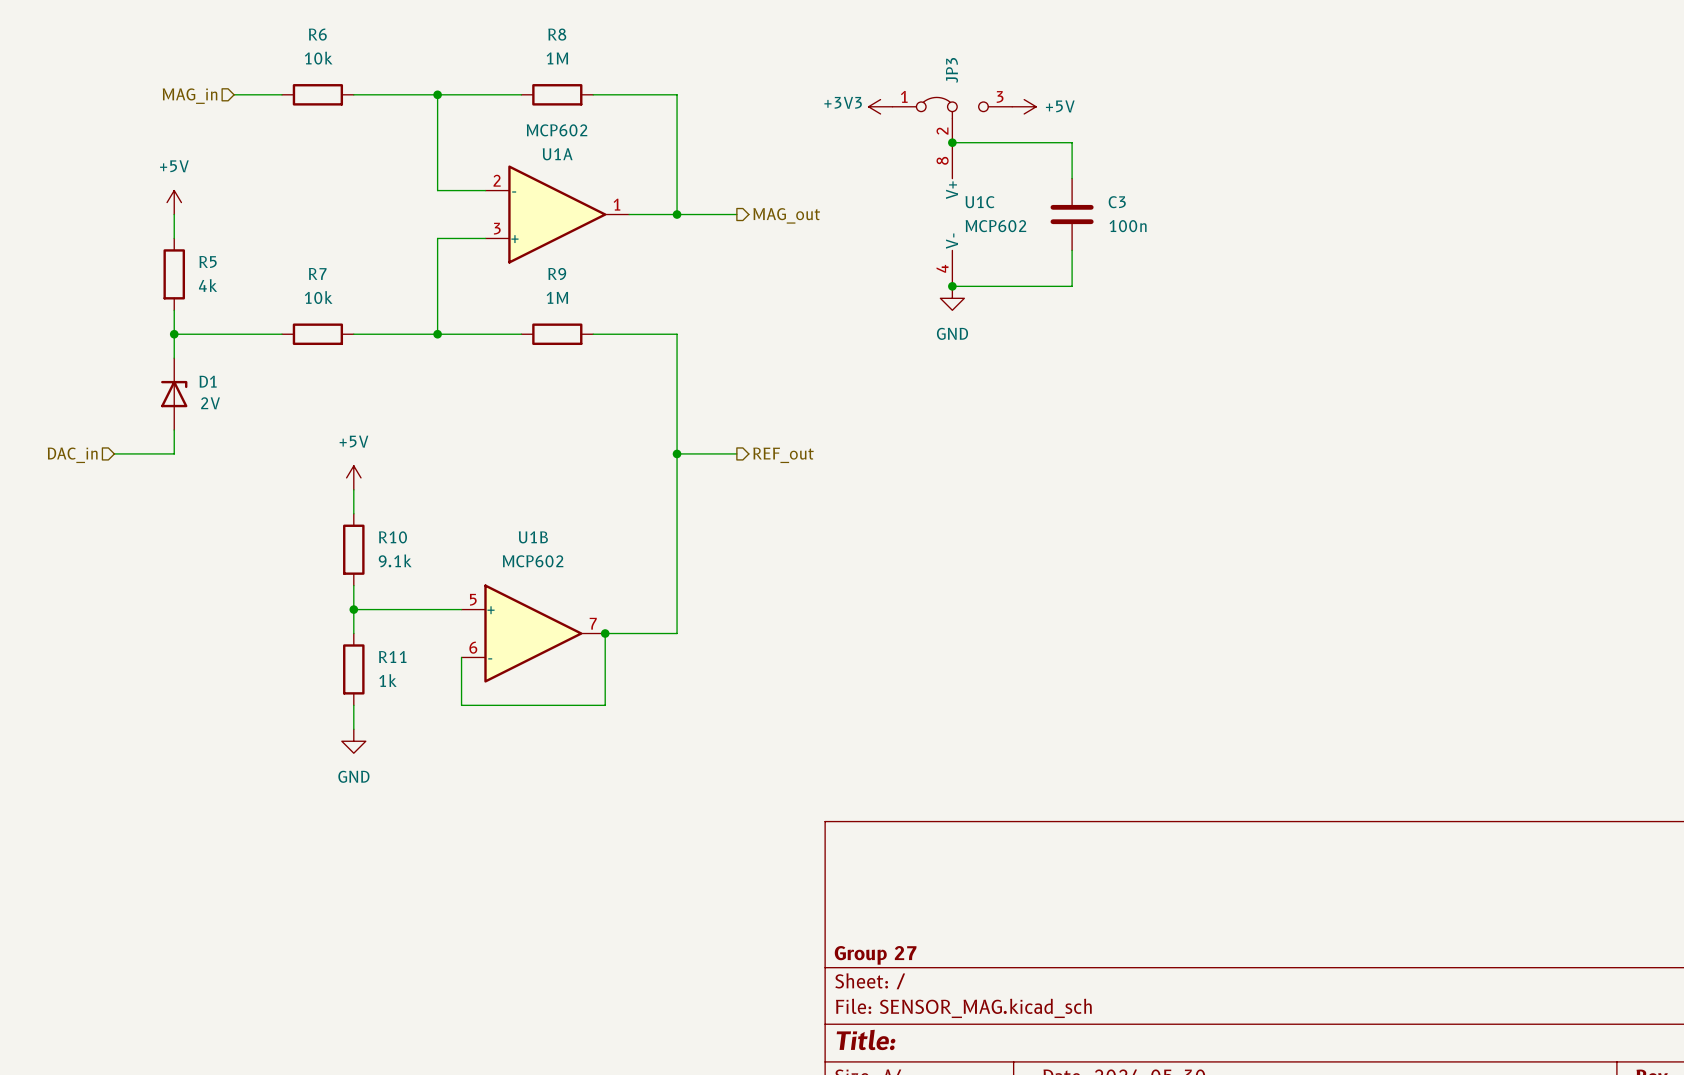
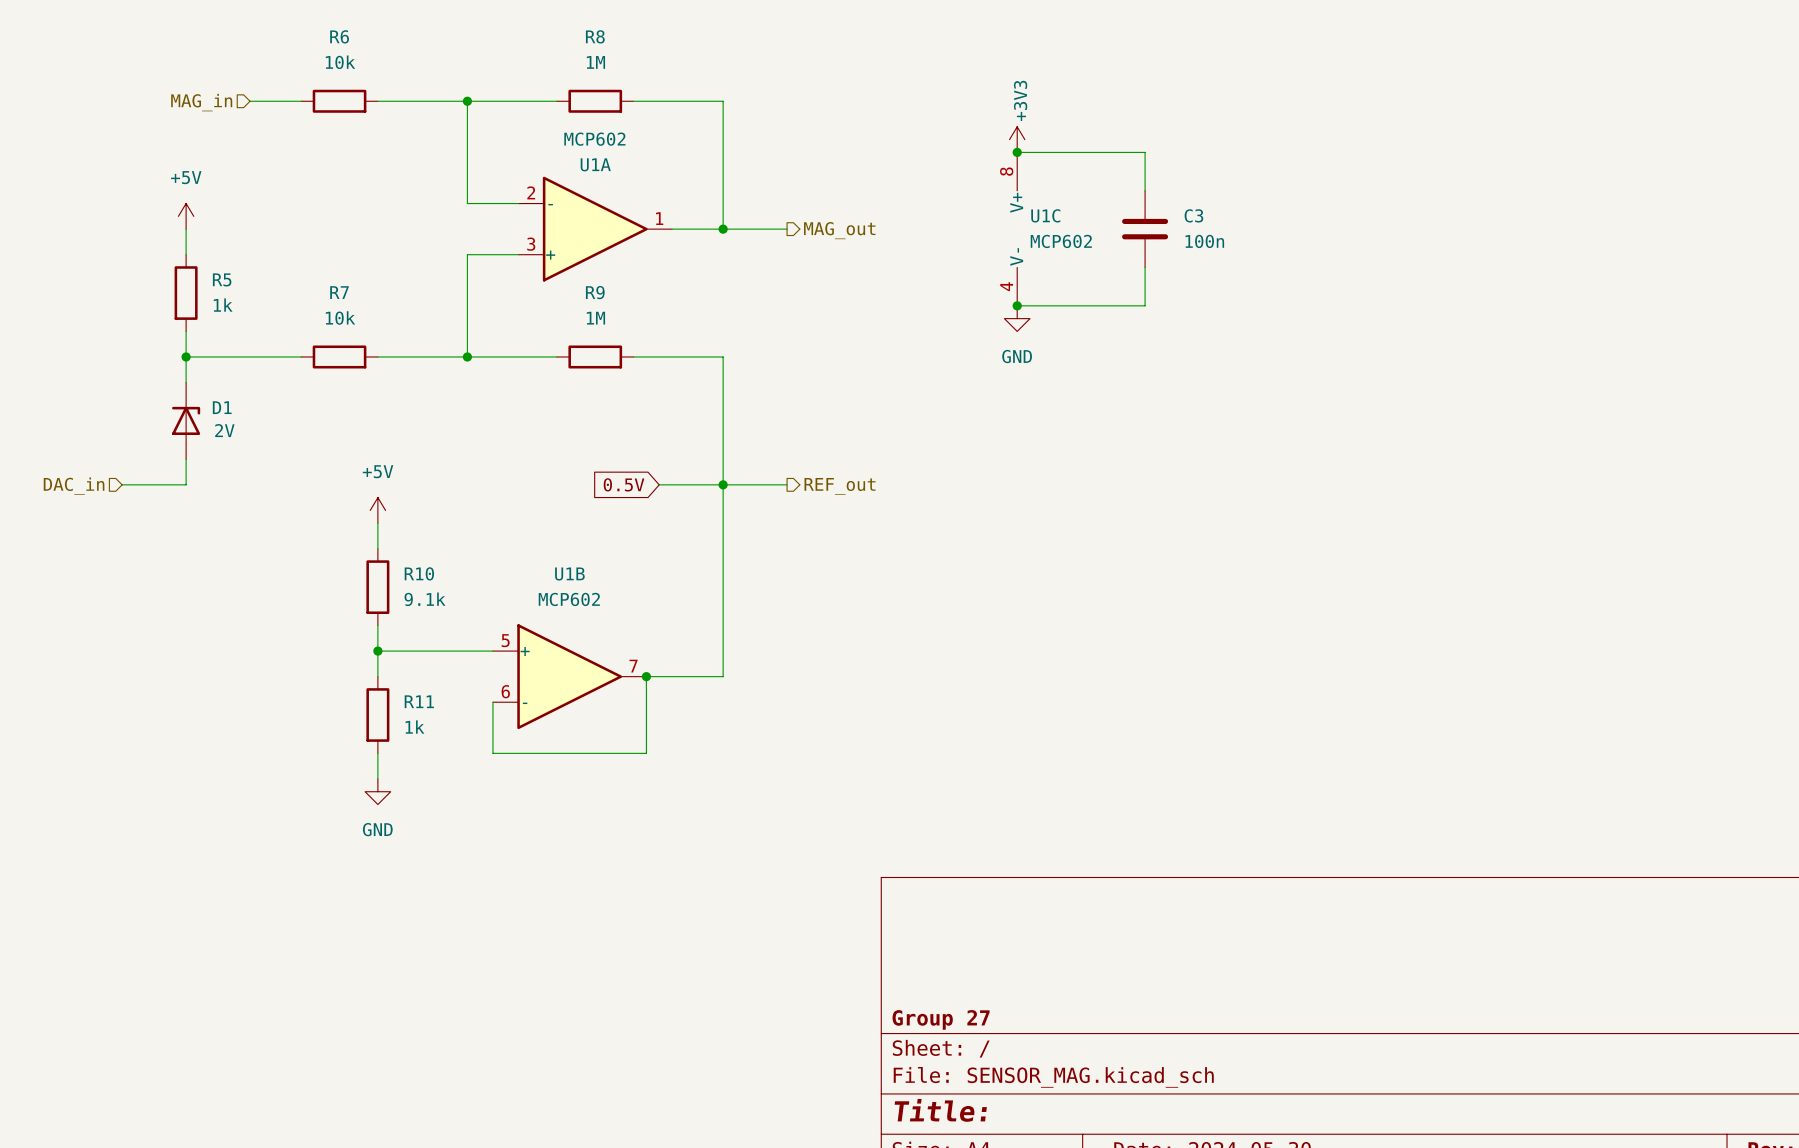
power symbol rotation: 0° (880, 106) -> 90° clockwise (1017, 139)
power symbol position: +3V3 (880, 106) -> +3V3 (1017, 139)
power symbol: +5V (1024, 106) -> none
JP3: (952, 120) -> none
R5 value: 4k (208, 285) -> 1k (223, 305)
wire: none -> (659, 484) (723, 484)
global label: none -> 0.5V (624, 484)

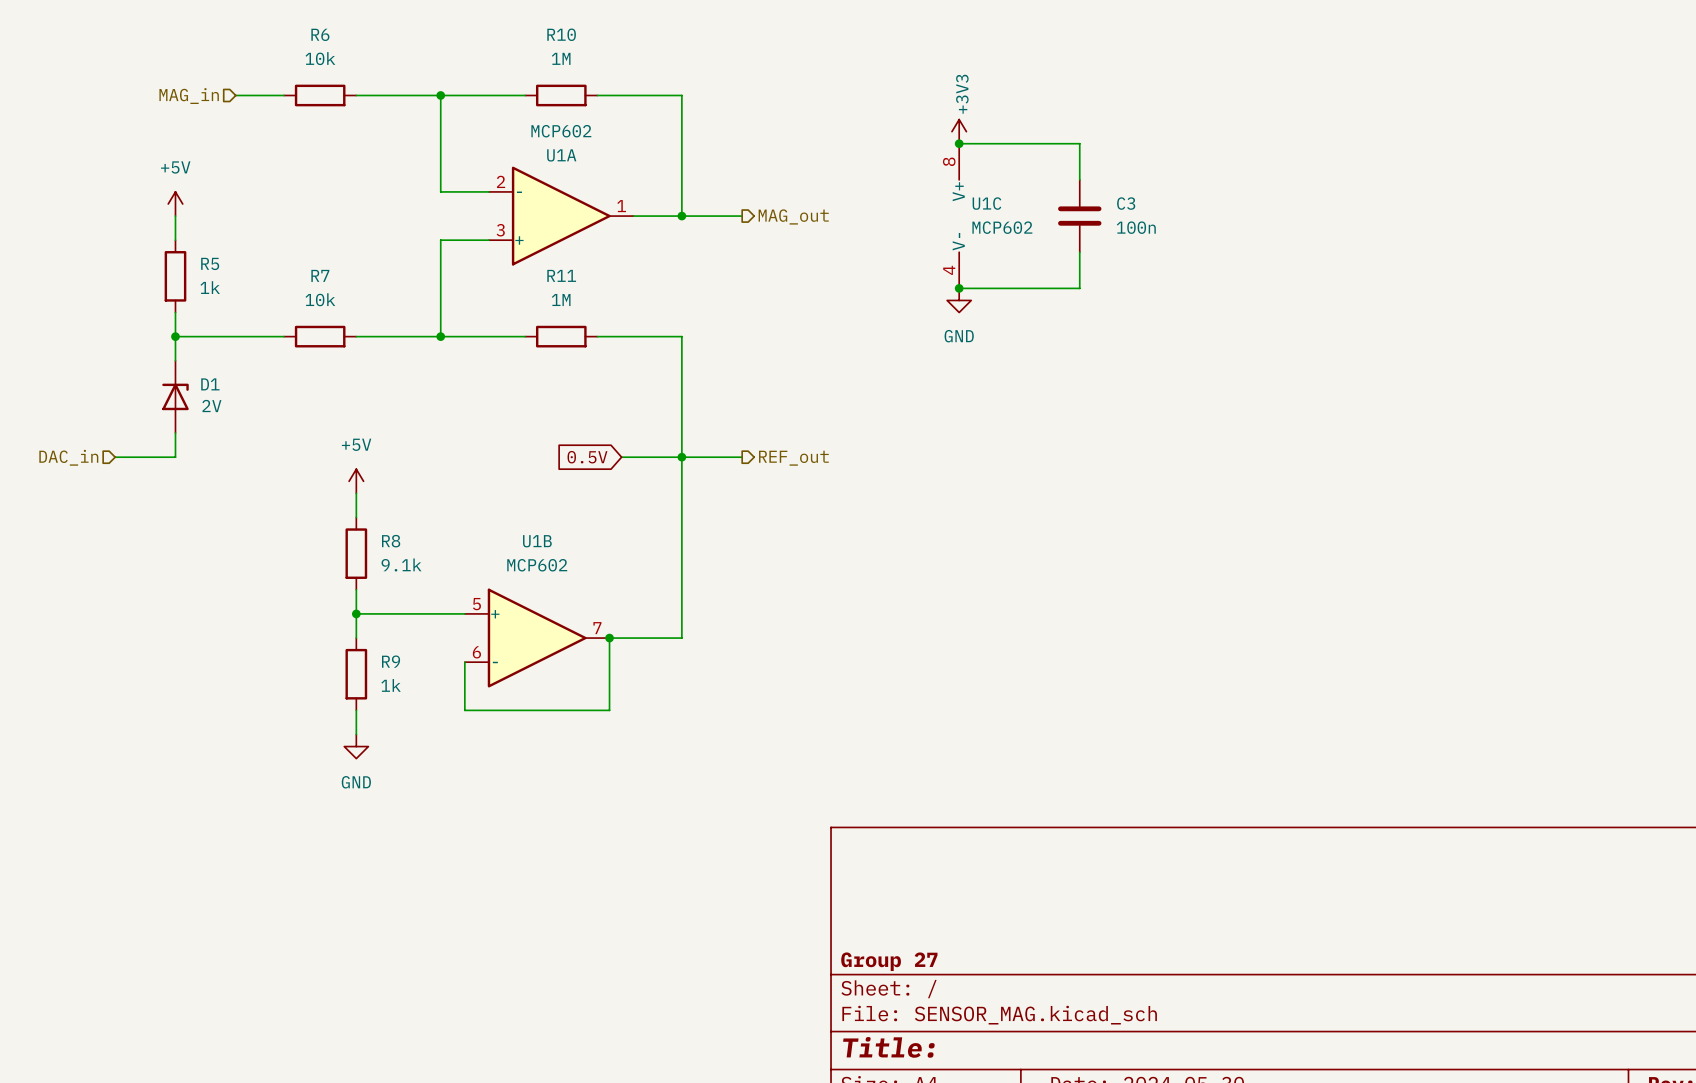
R8 name: R8 (595, 36) -> R10 (561, 34)
R9 name: R9 (595, 292) -> R11 (561, 275)
R10 name: R10 (419, 573) -> R8 (391, 541)
R11 name: R11 (419, 701) -> R9 (391, 661)

